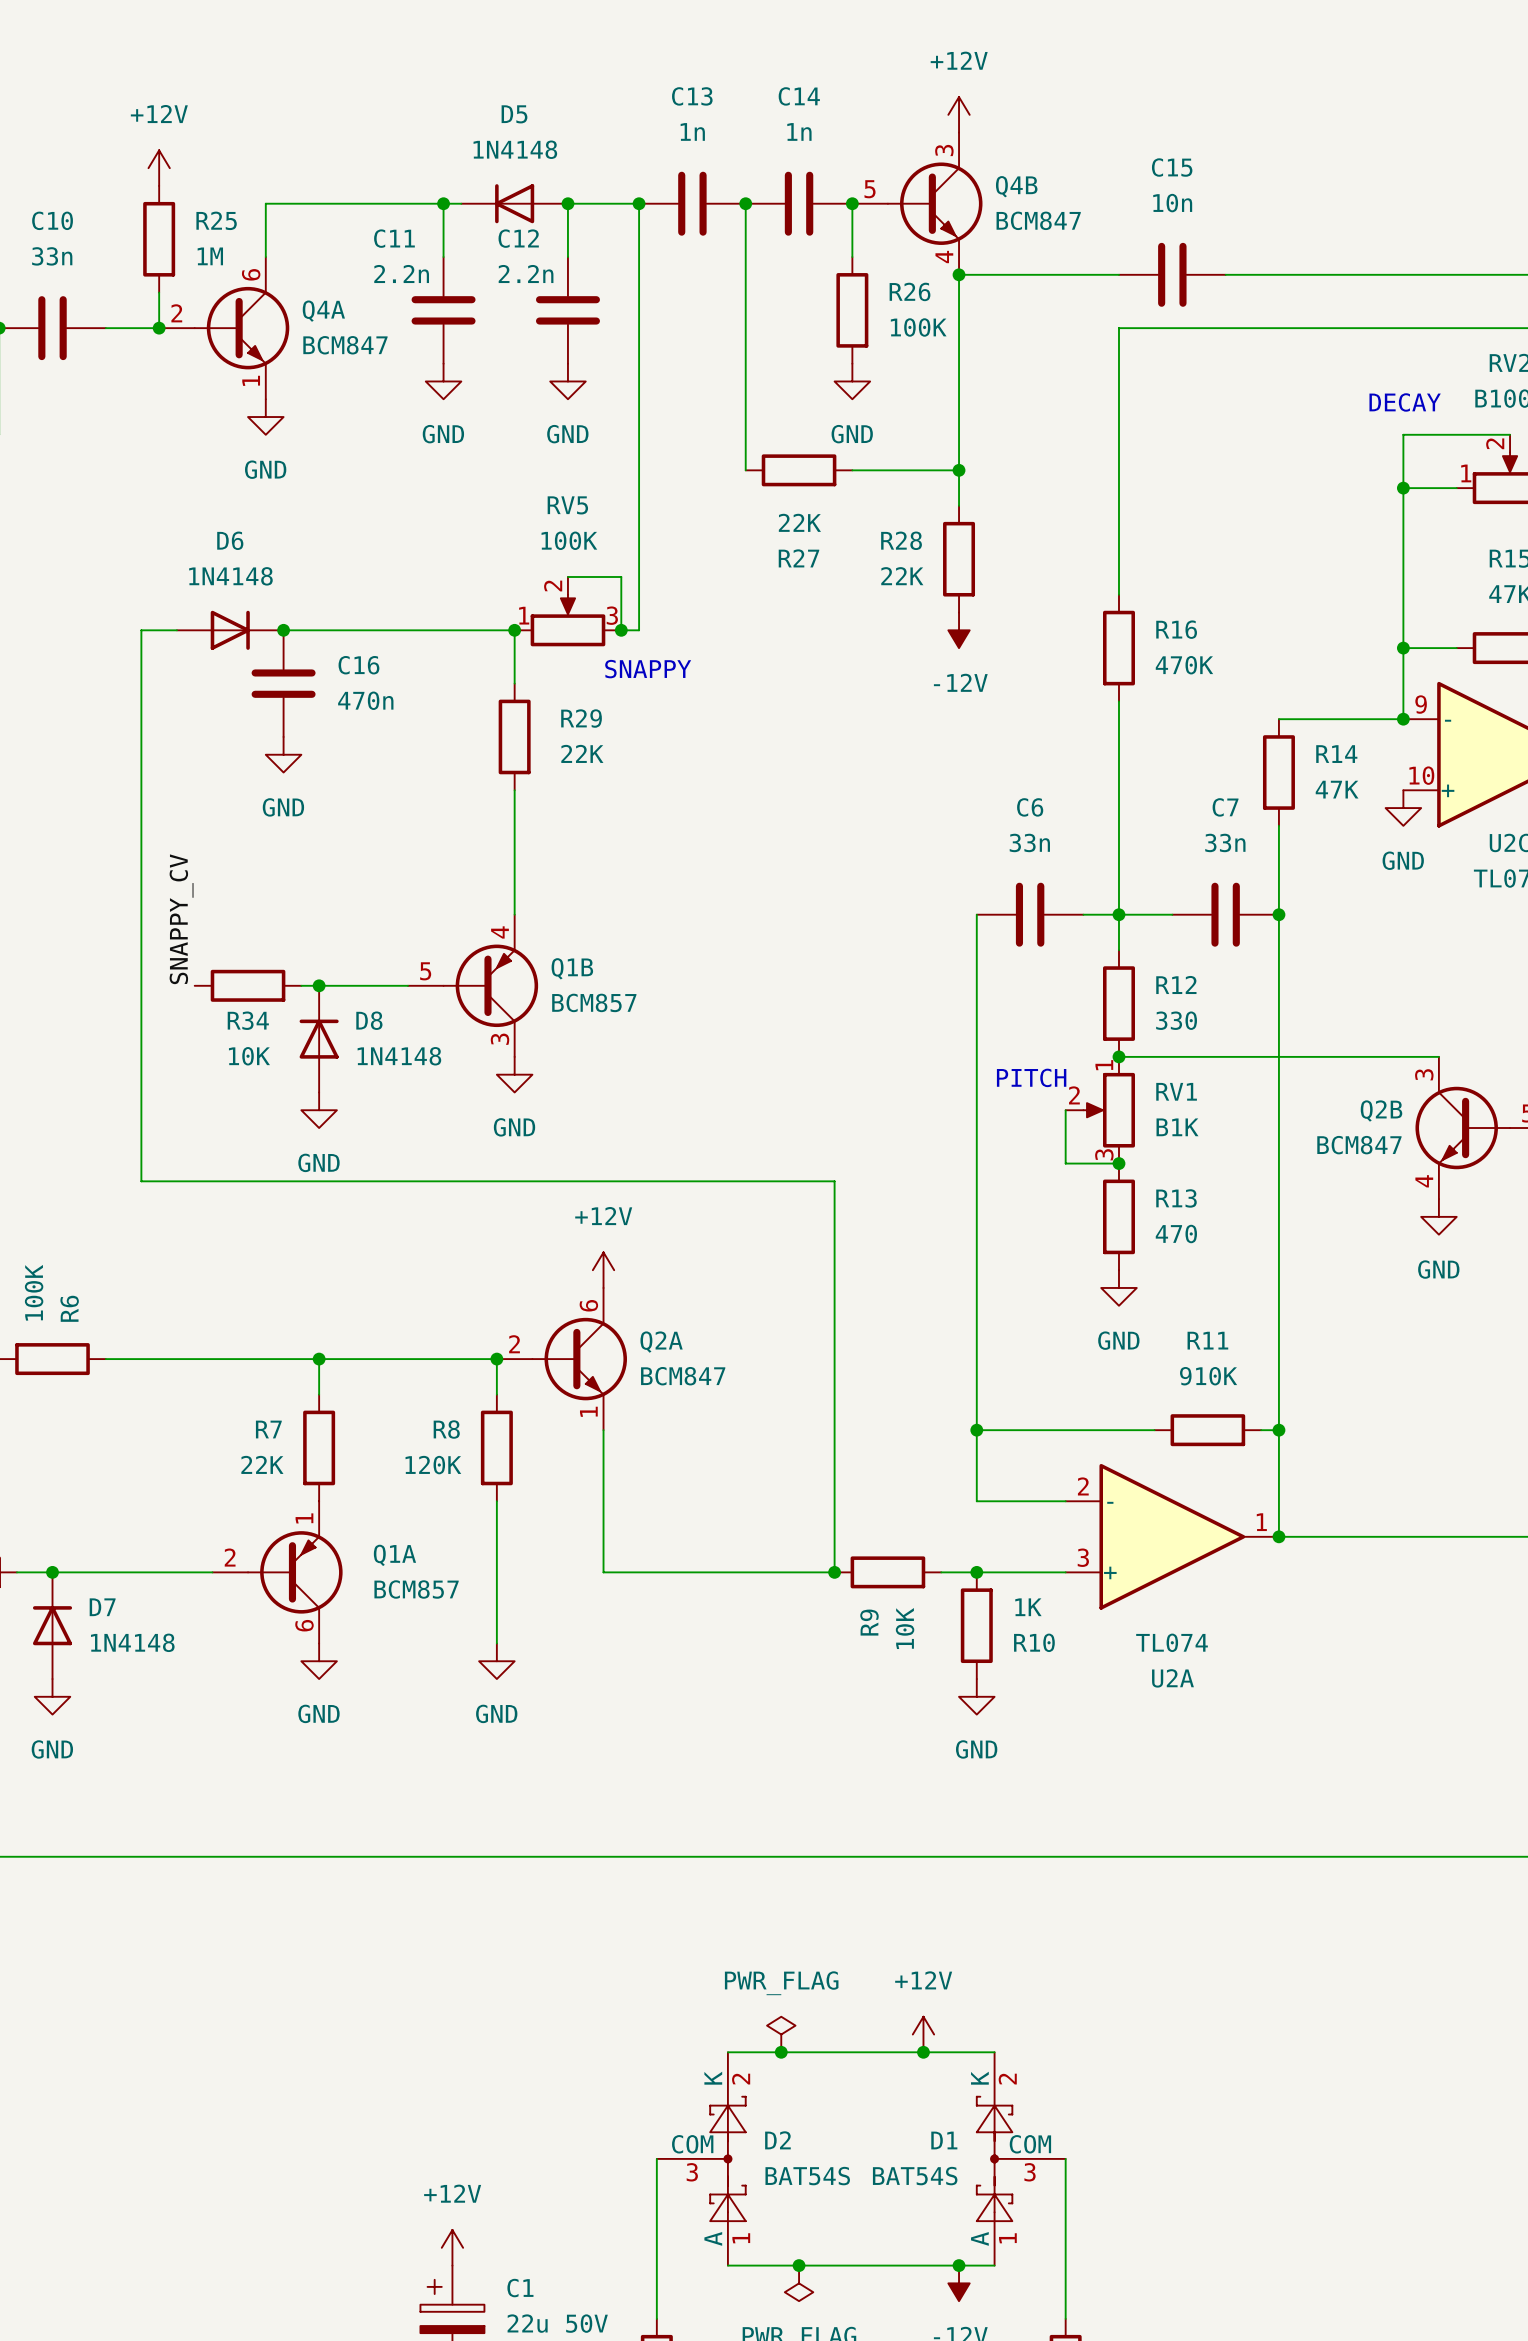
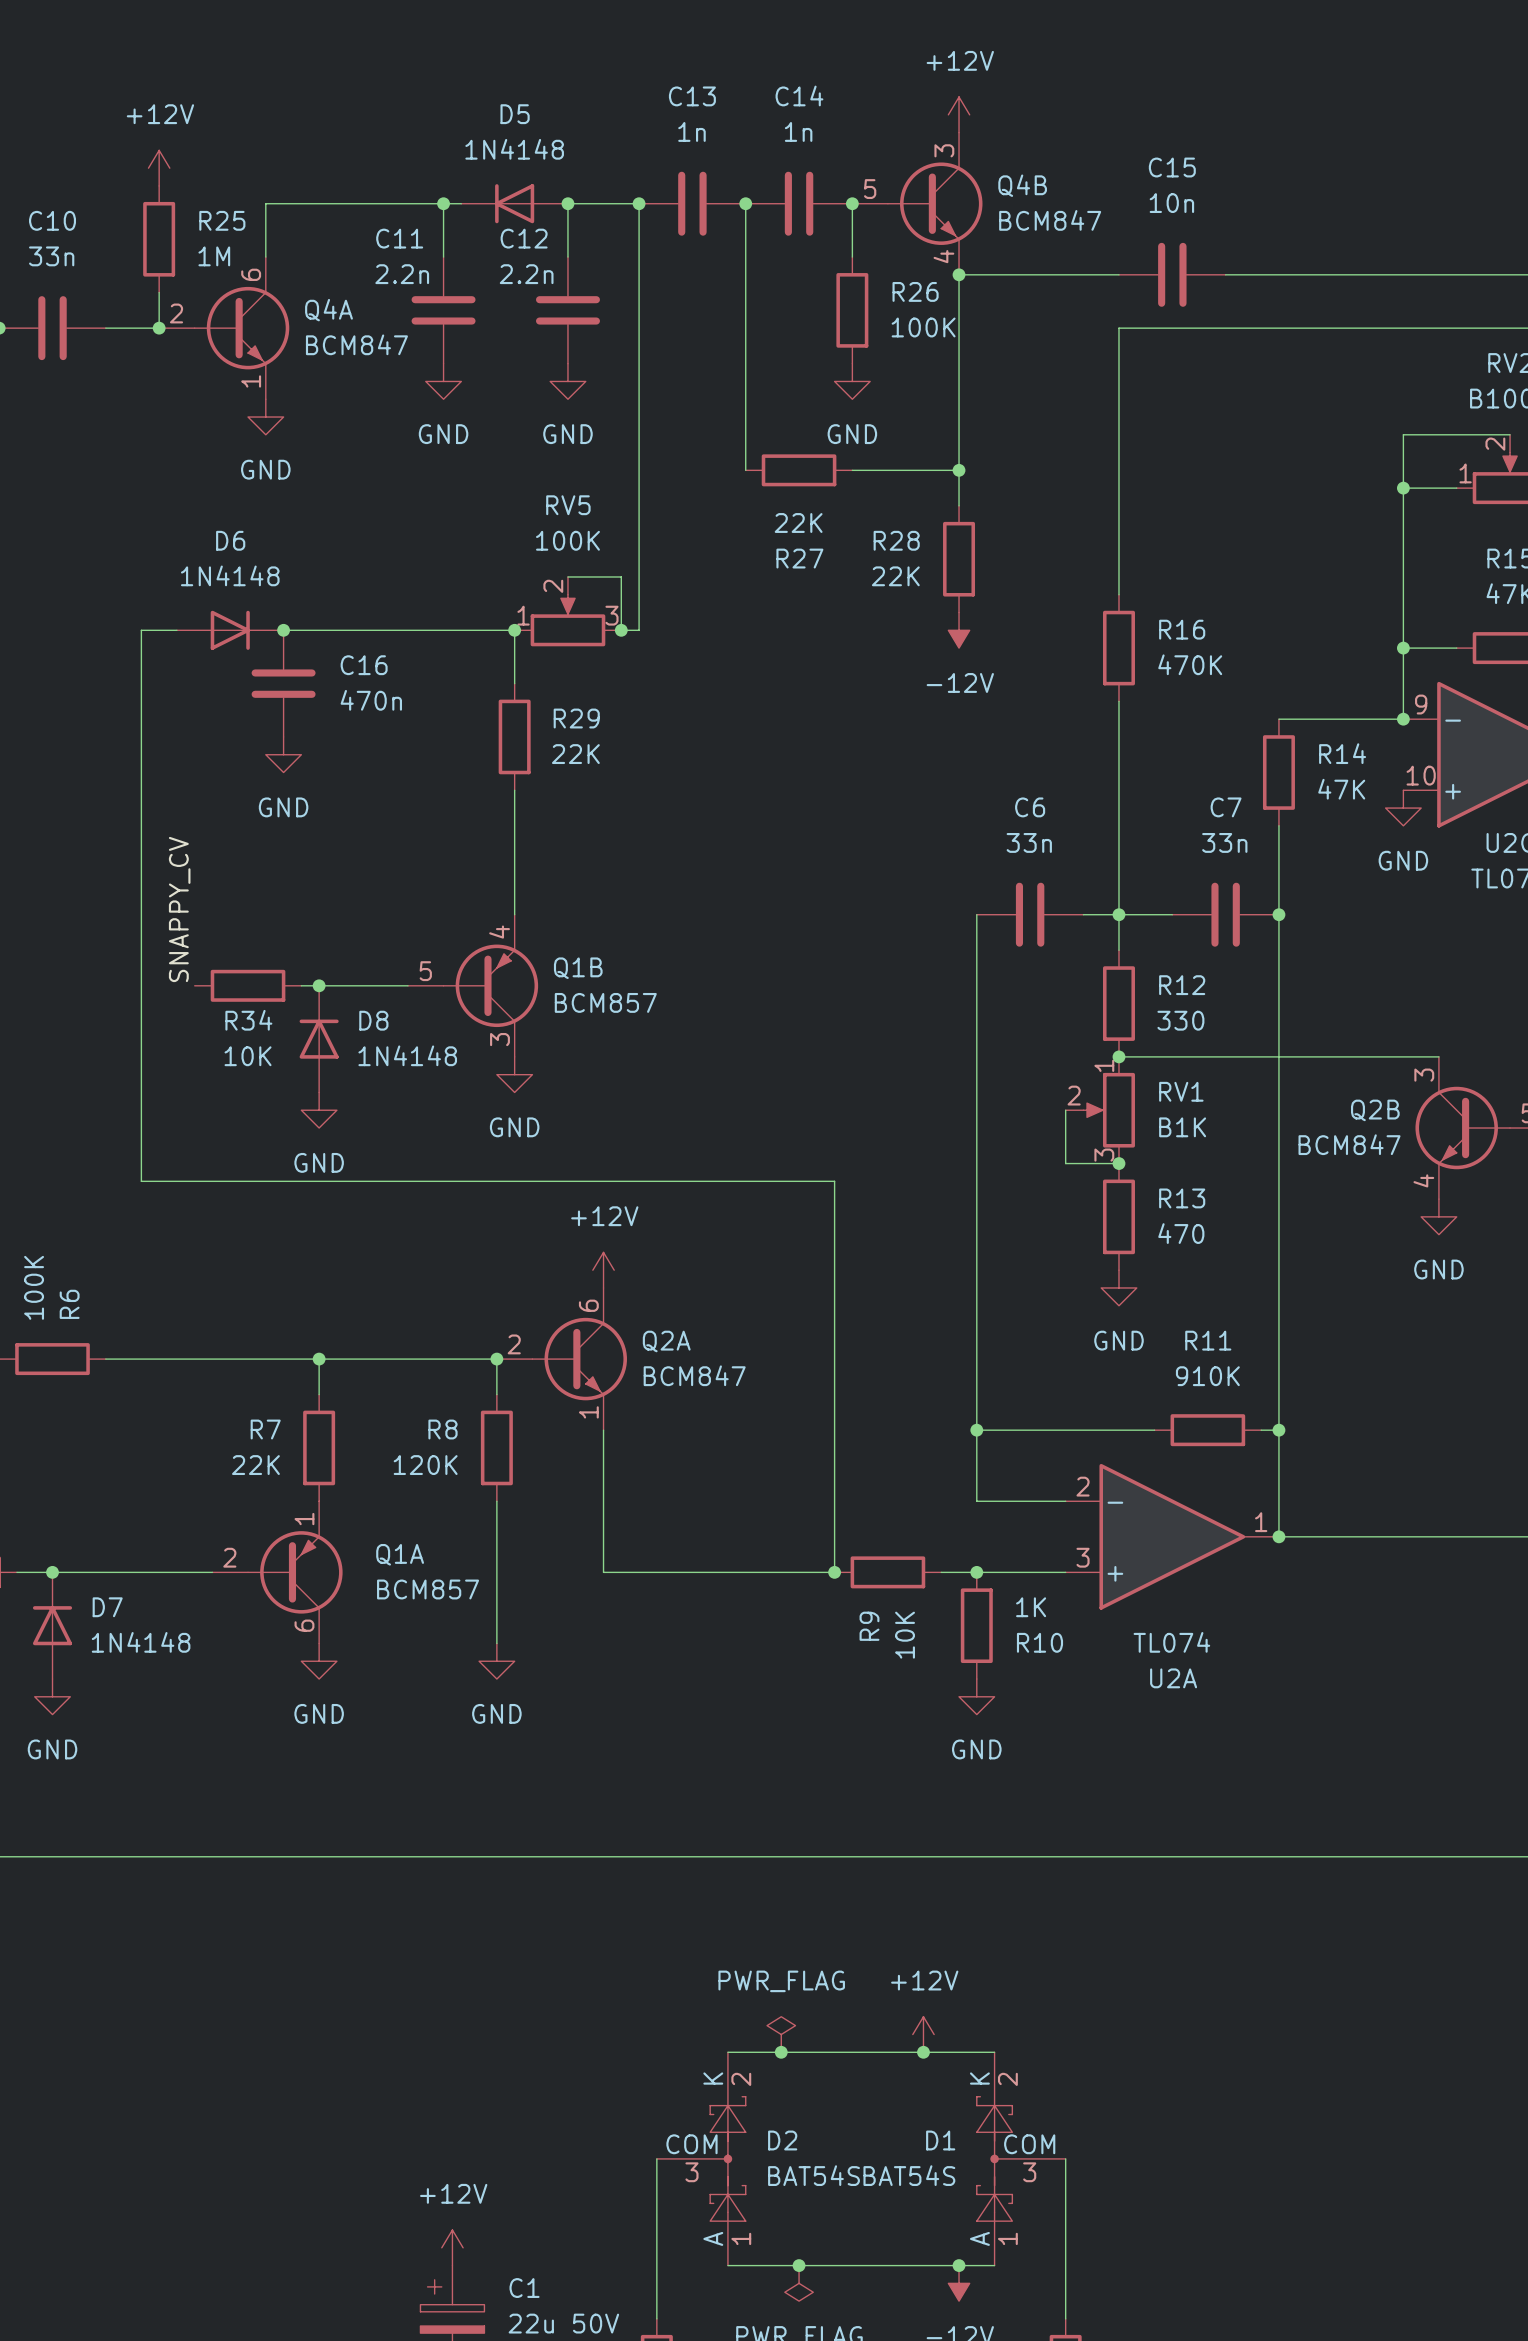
text: DECAY (1405, 402) -> none
text: SNAPPY (648, 669) -> none
text: PITCH (1031, 1077) -> none

